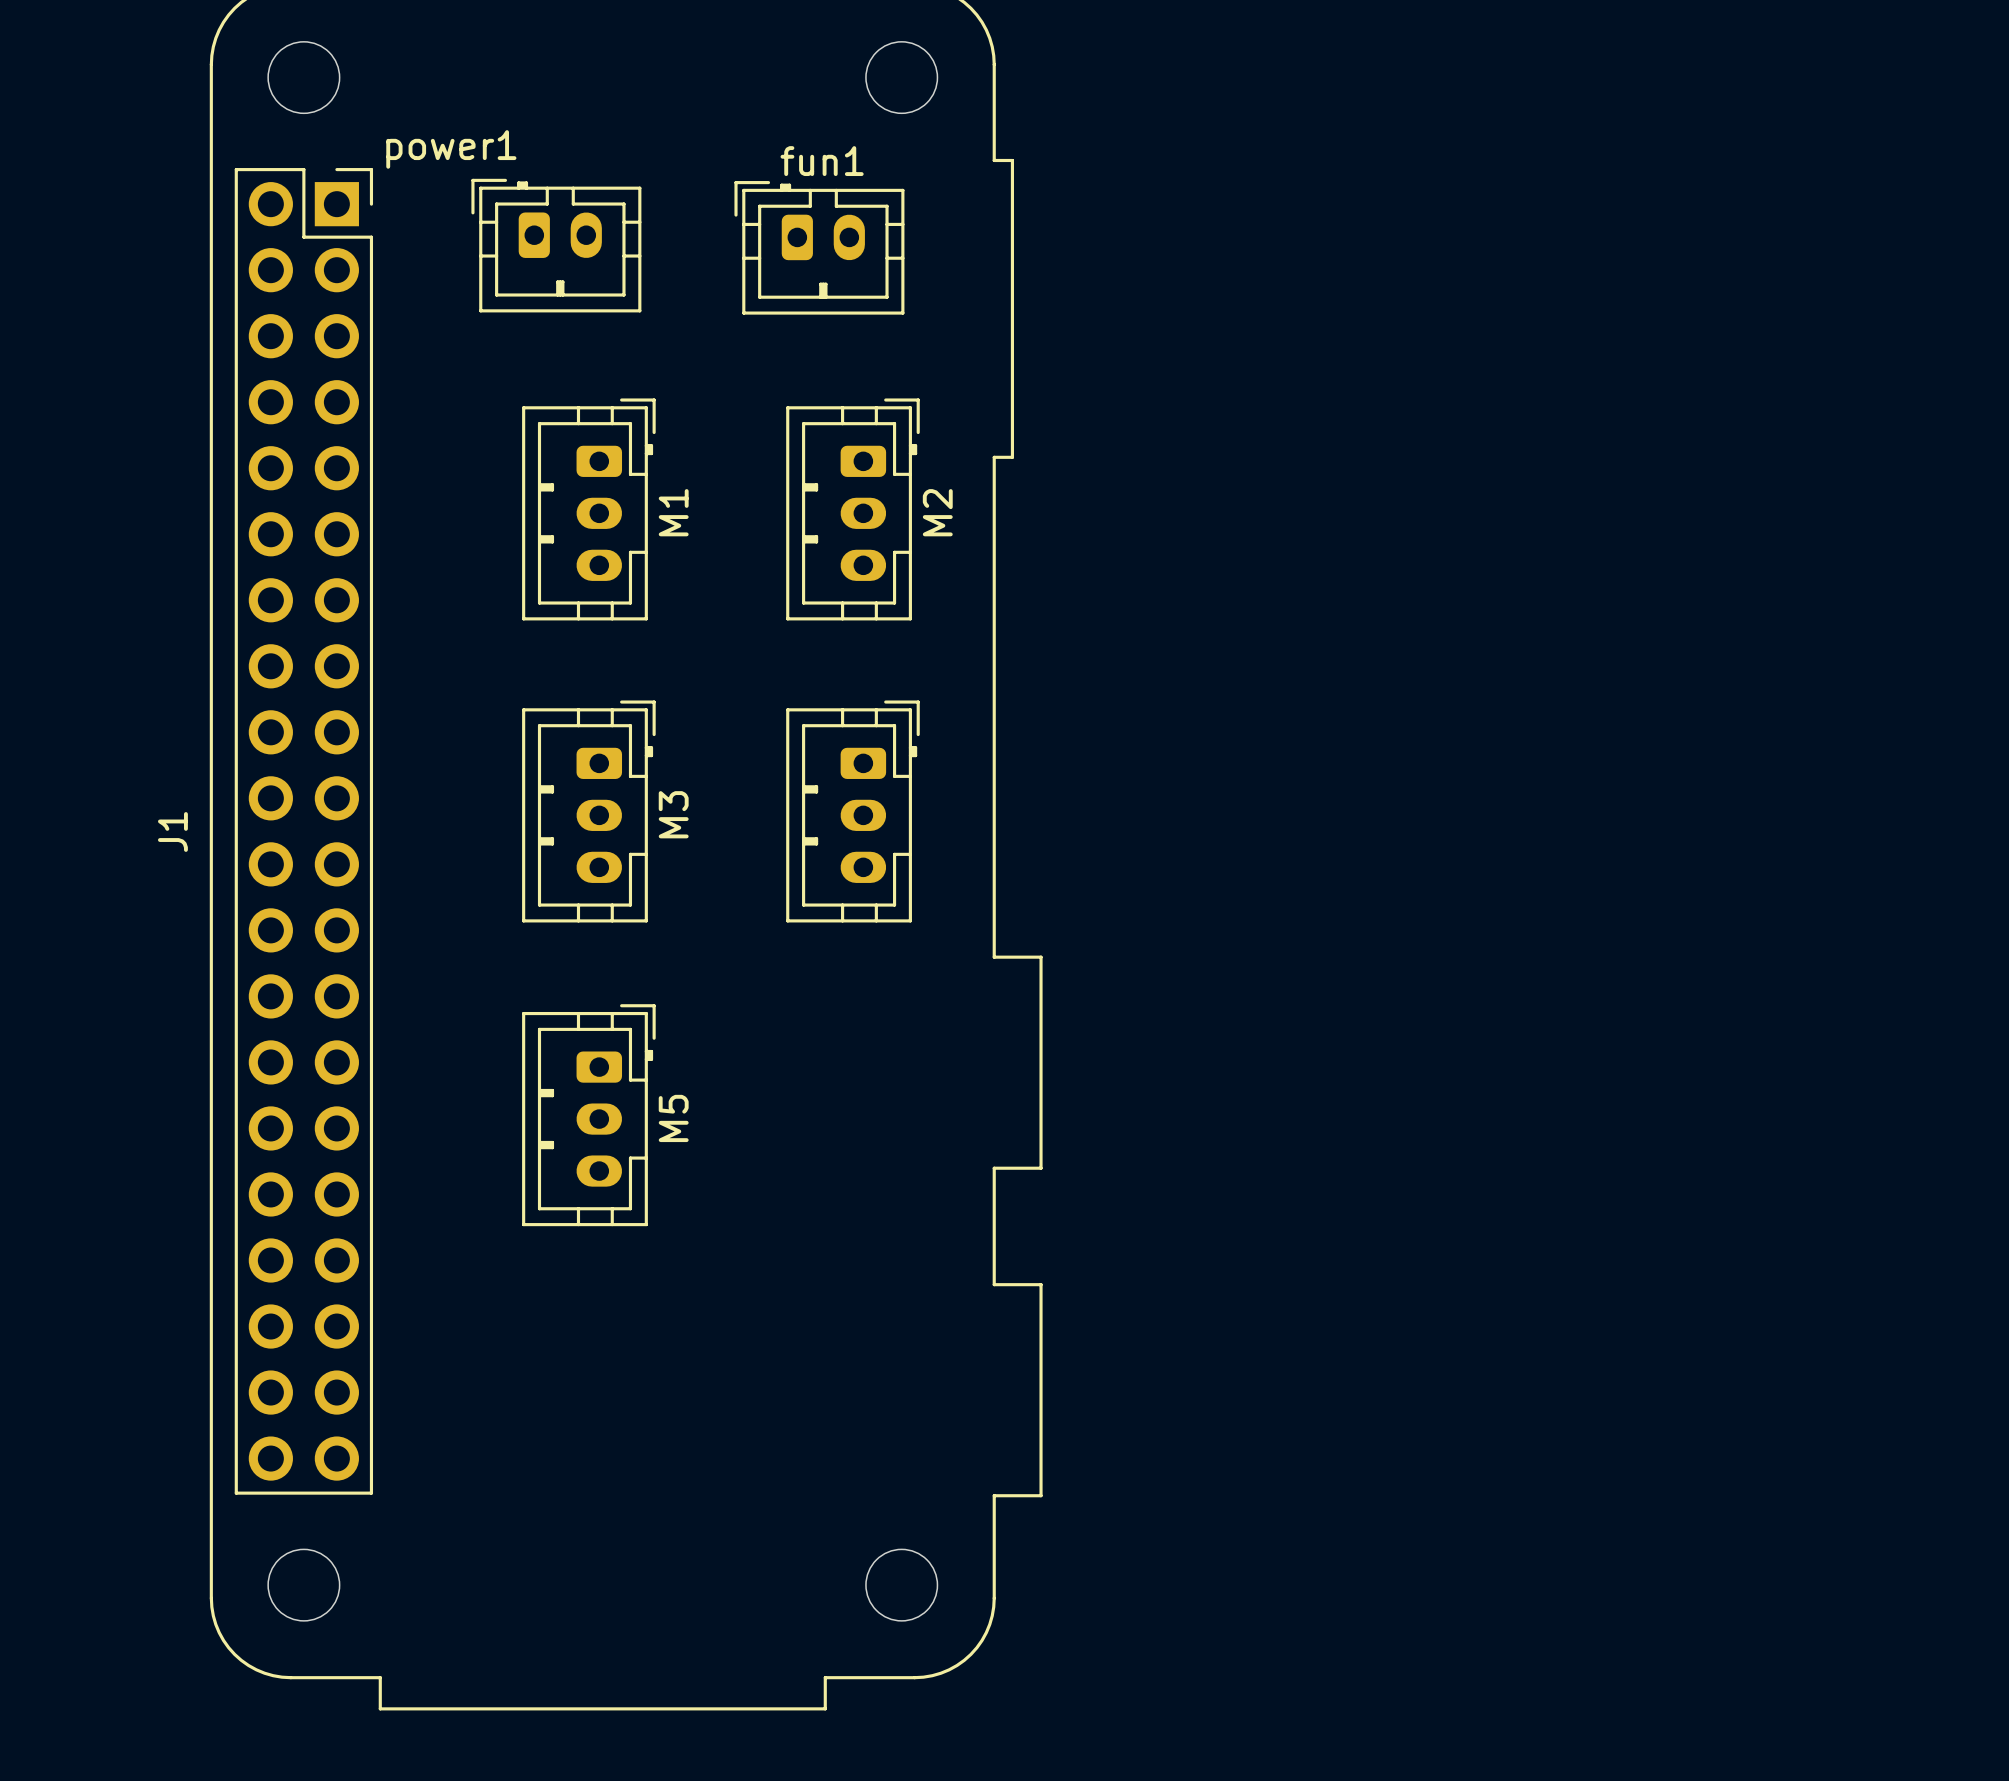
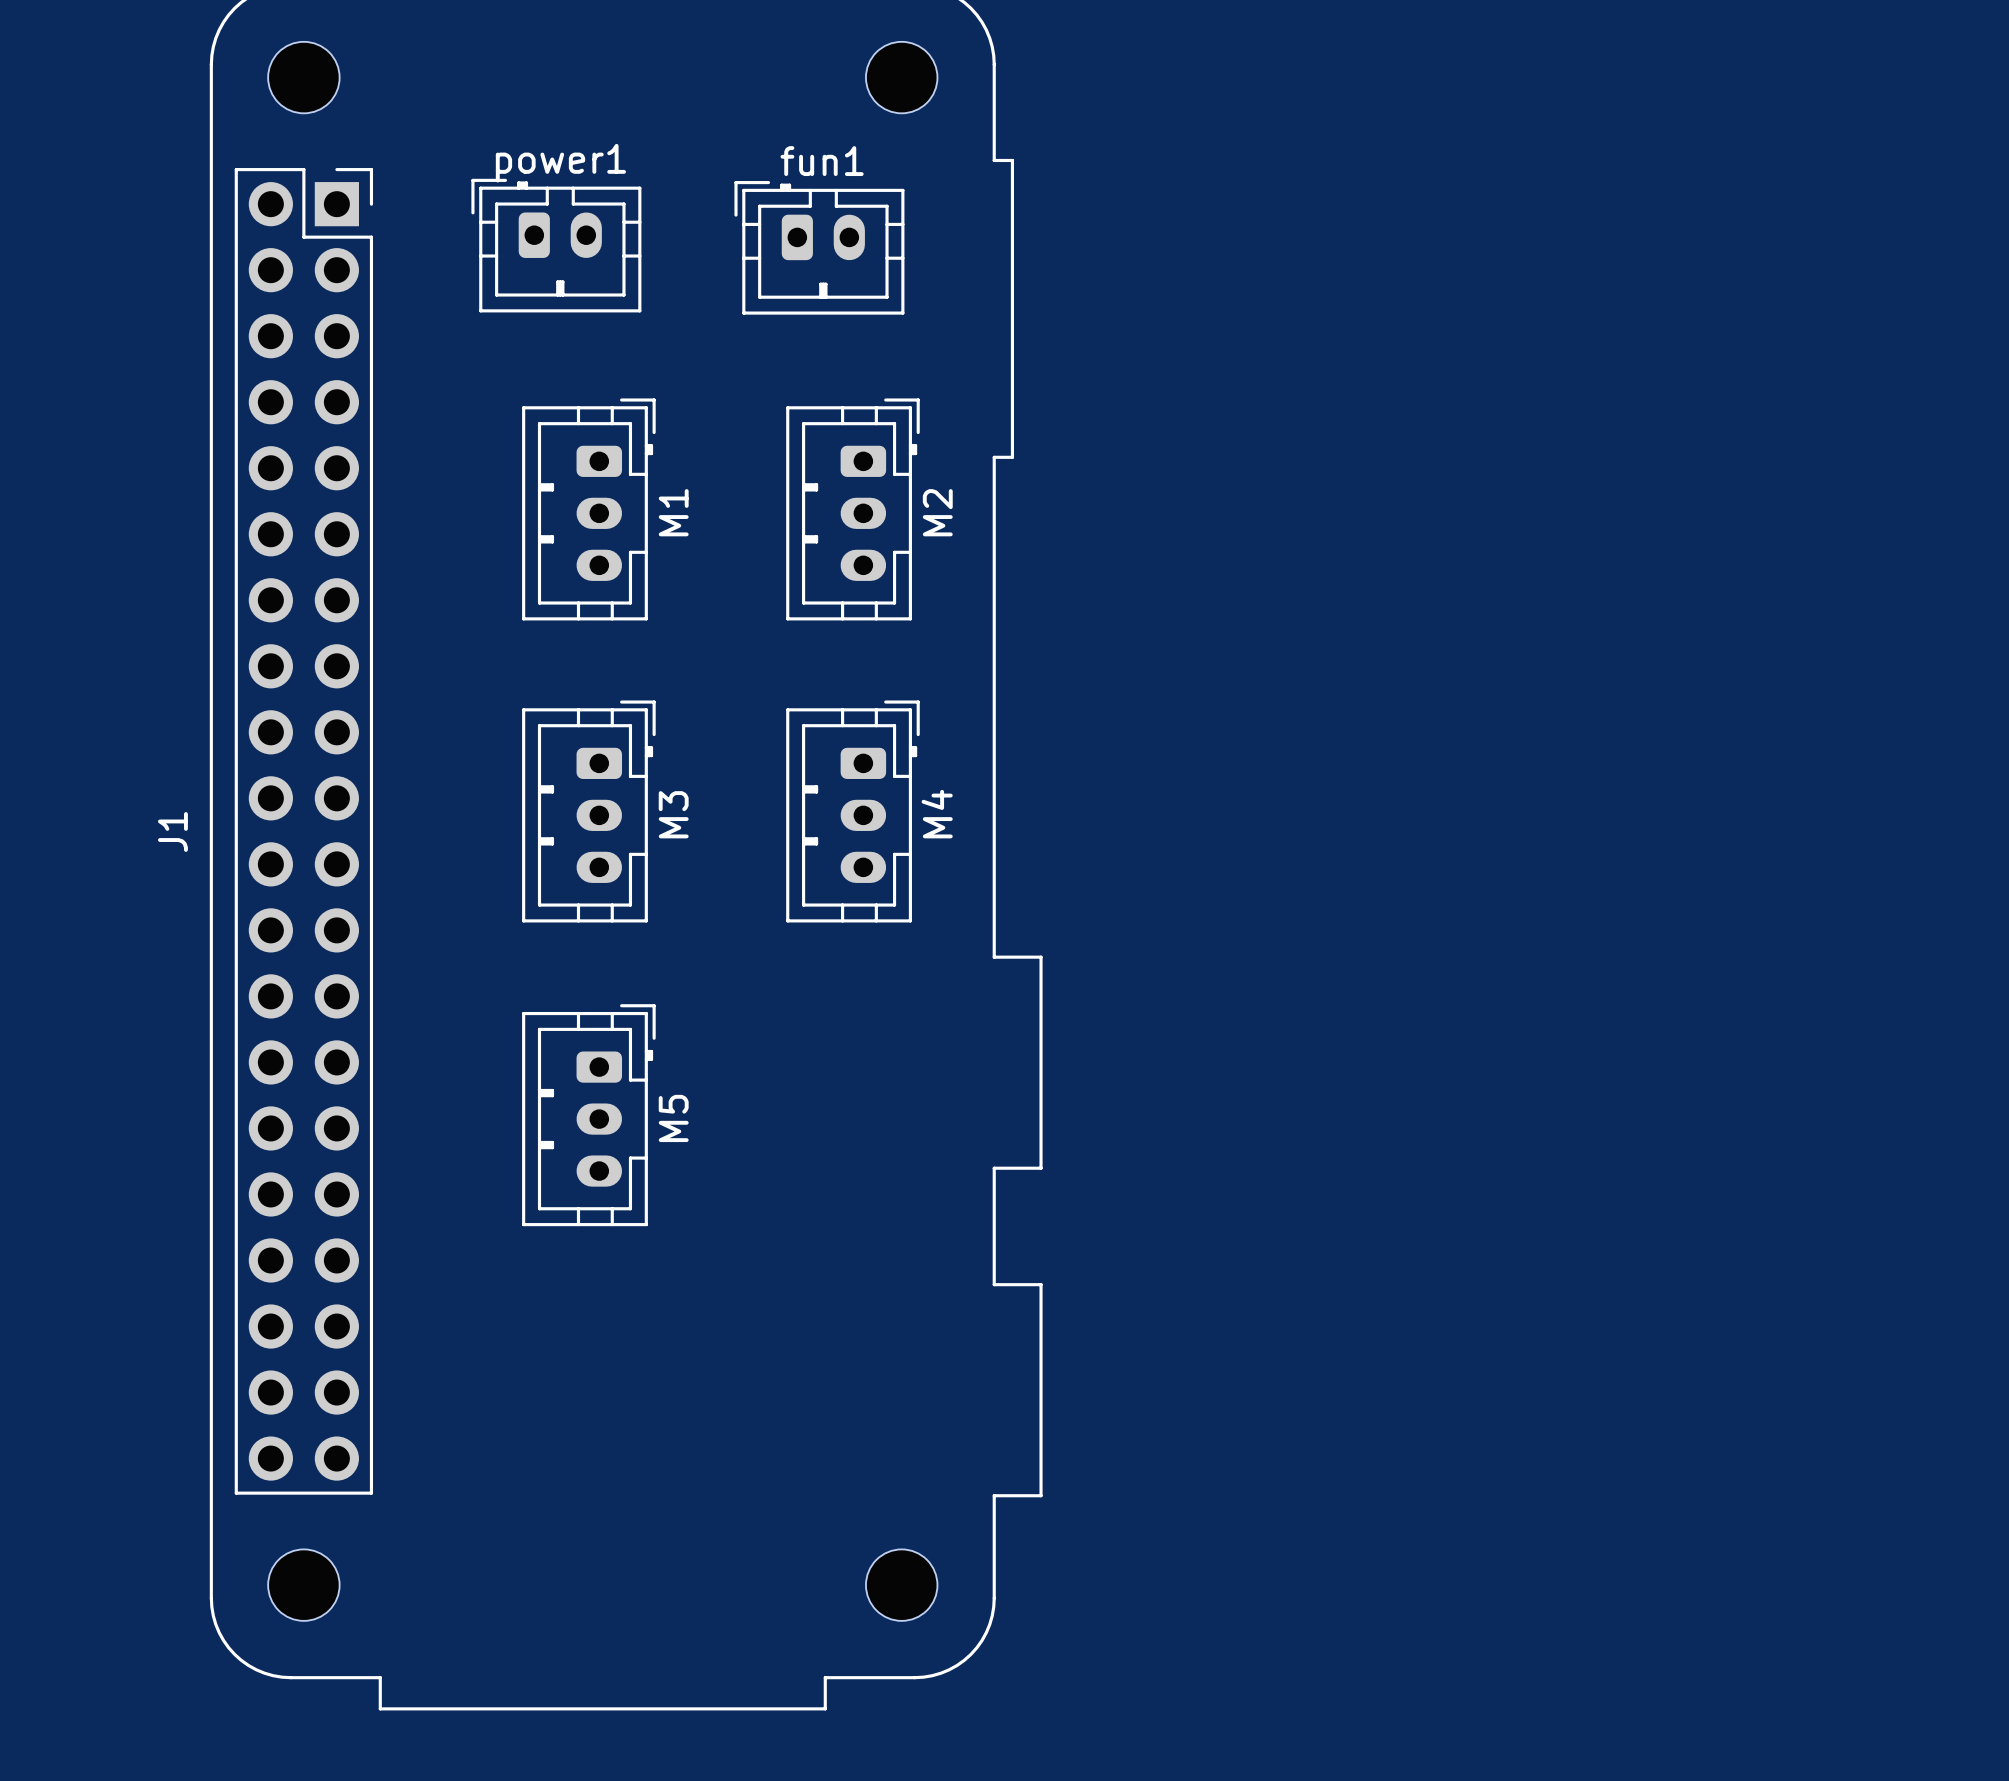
power1 name position: power1 (451, 149) -> power1 (560, 163)
M4 name: none -> M4 (937, 814)

